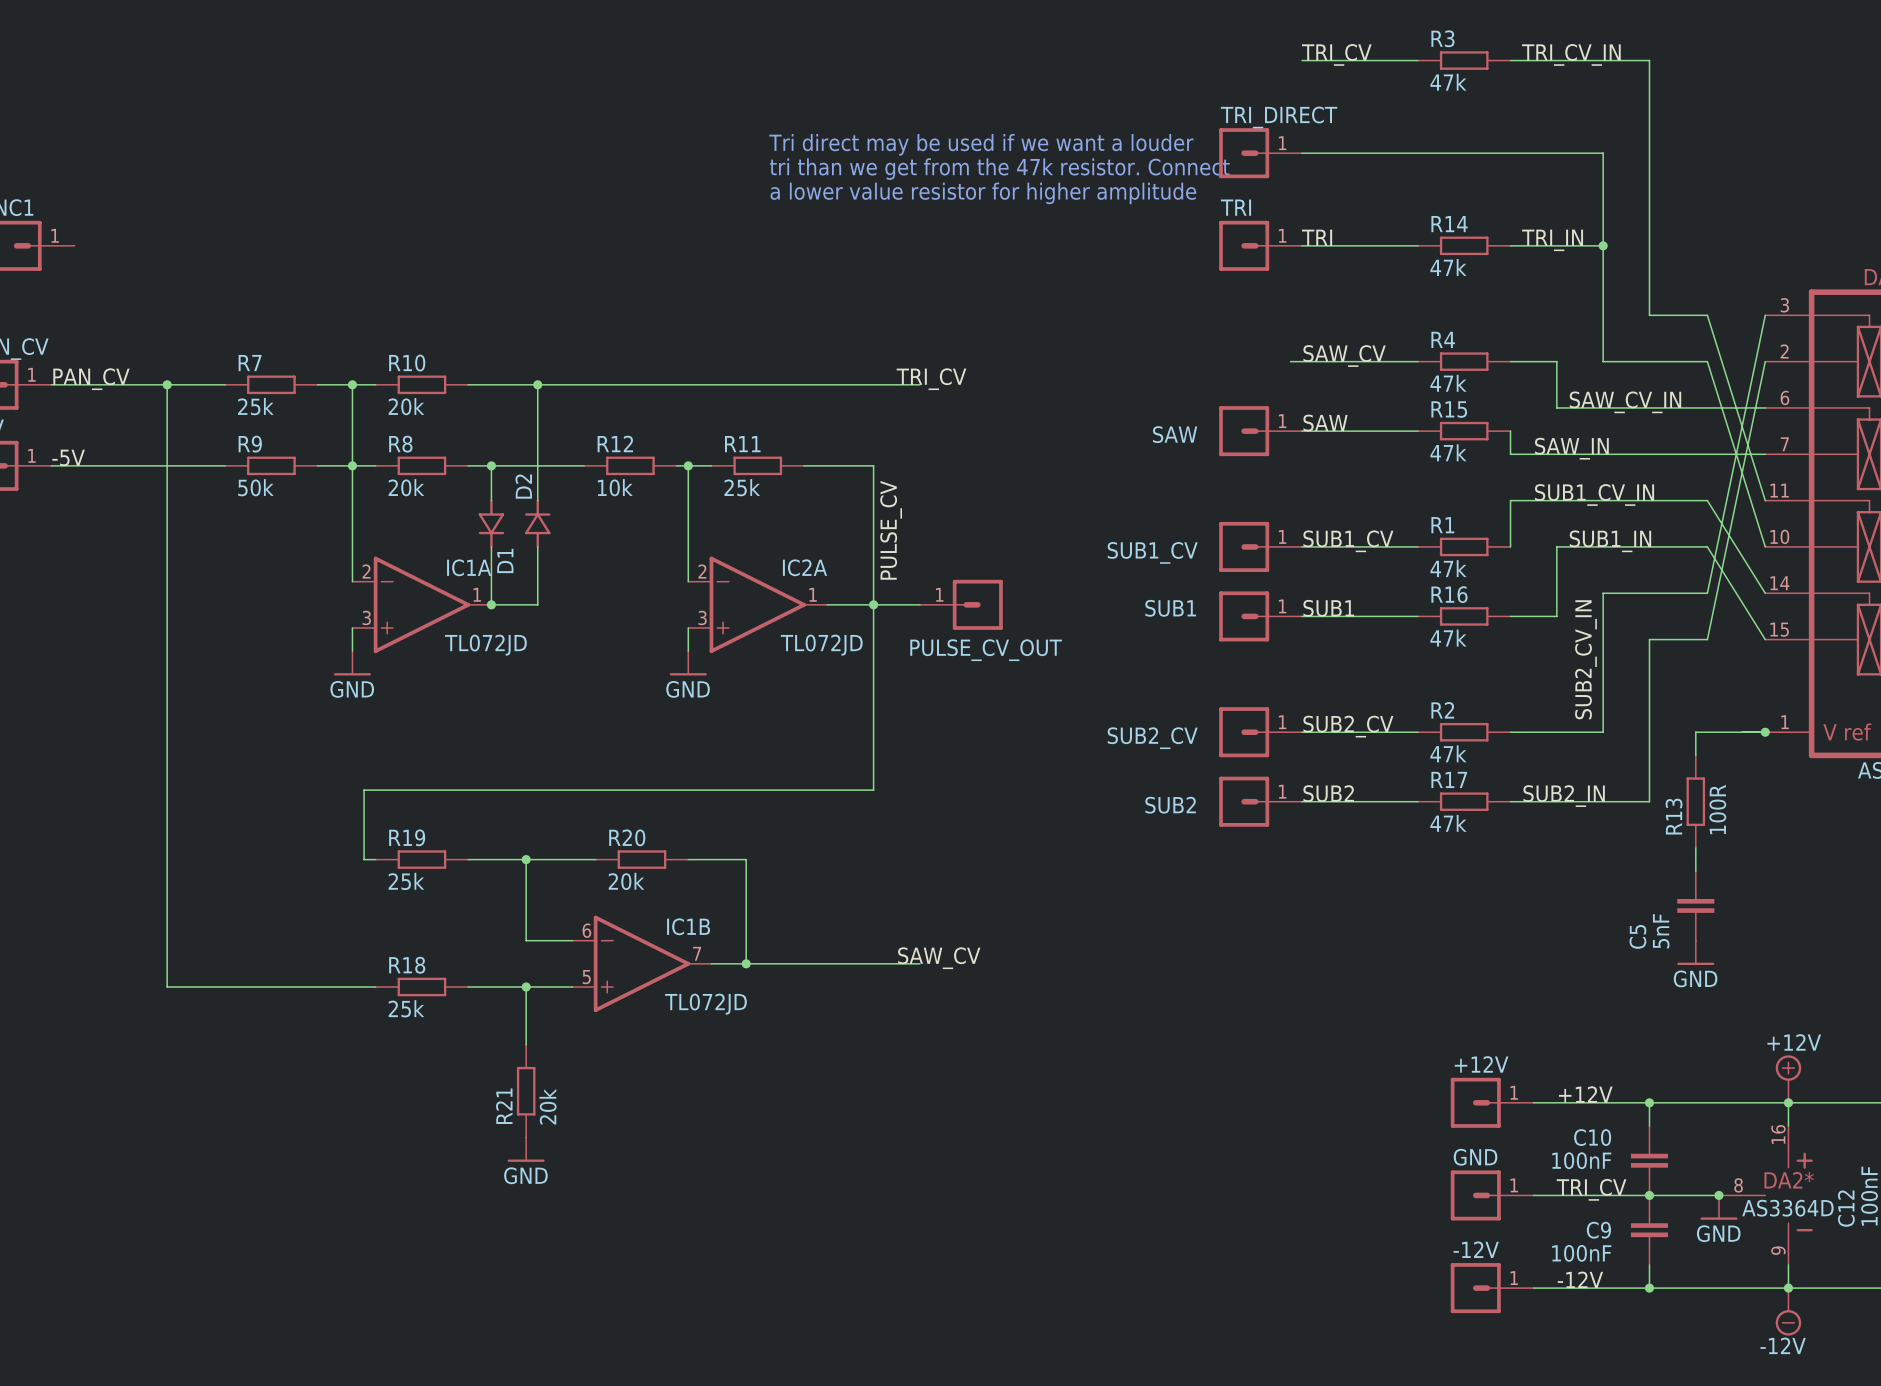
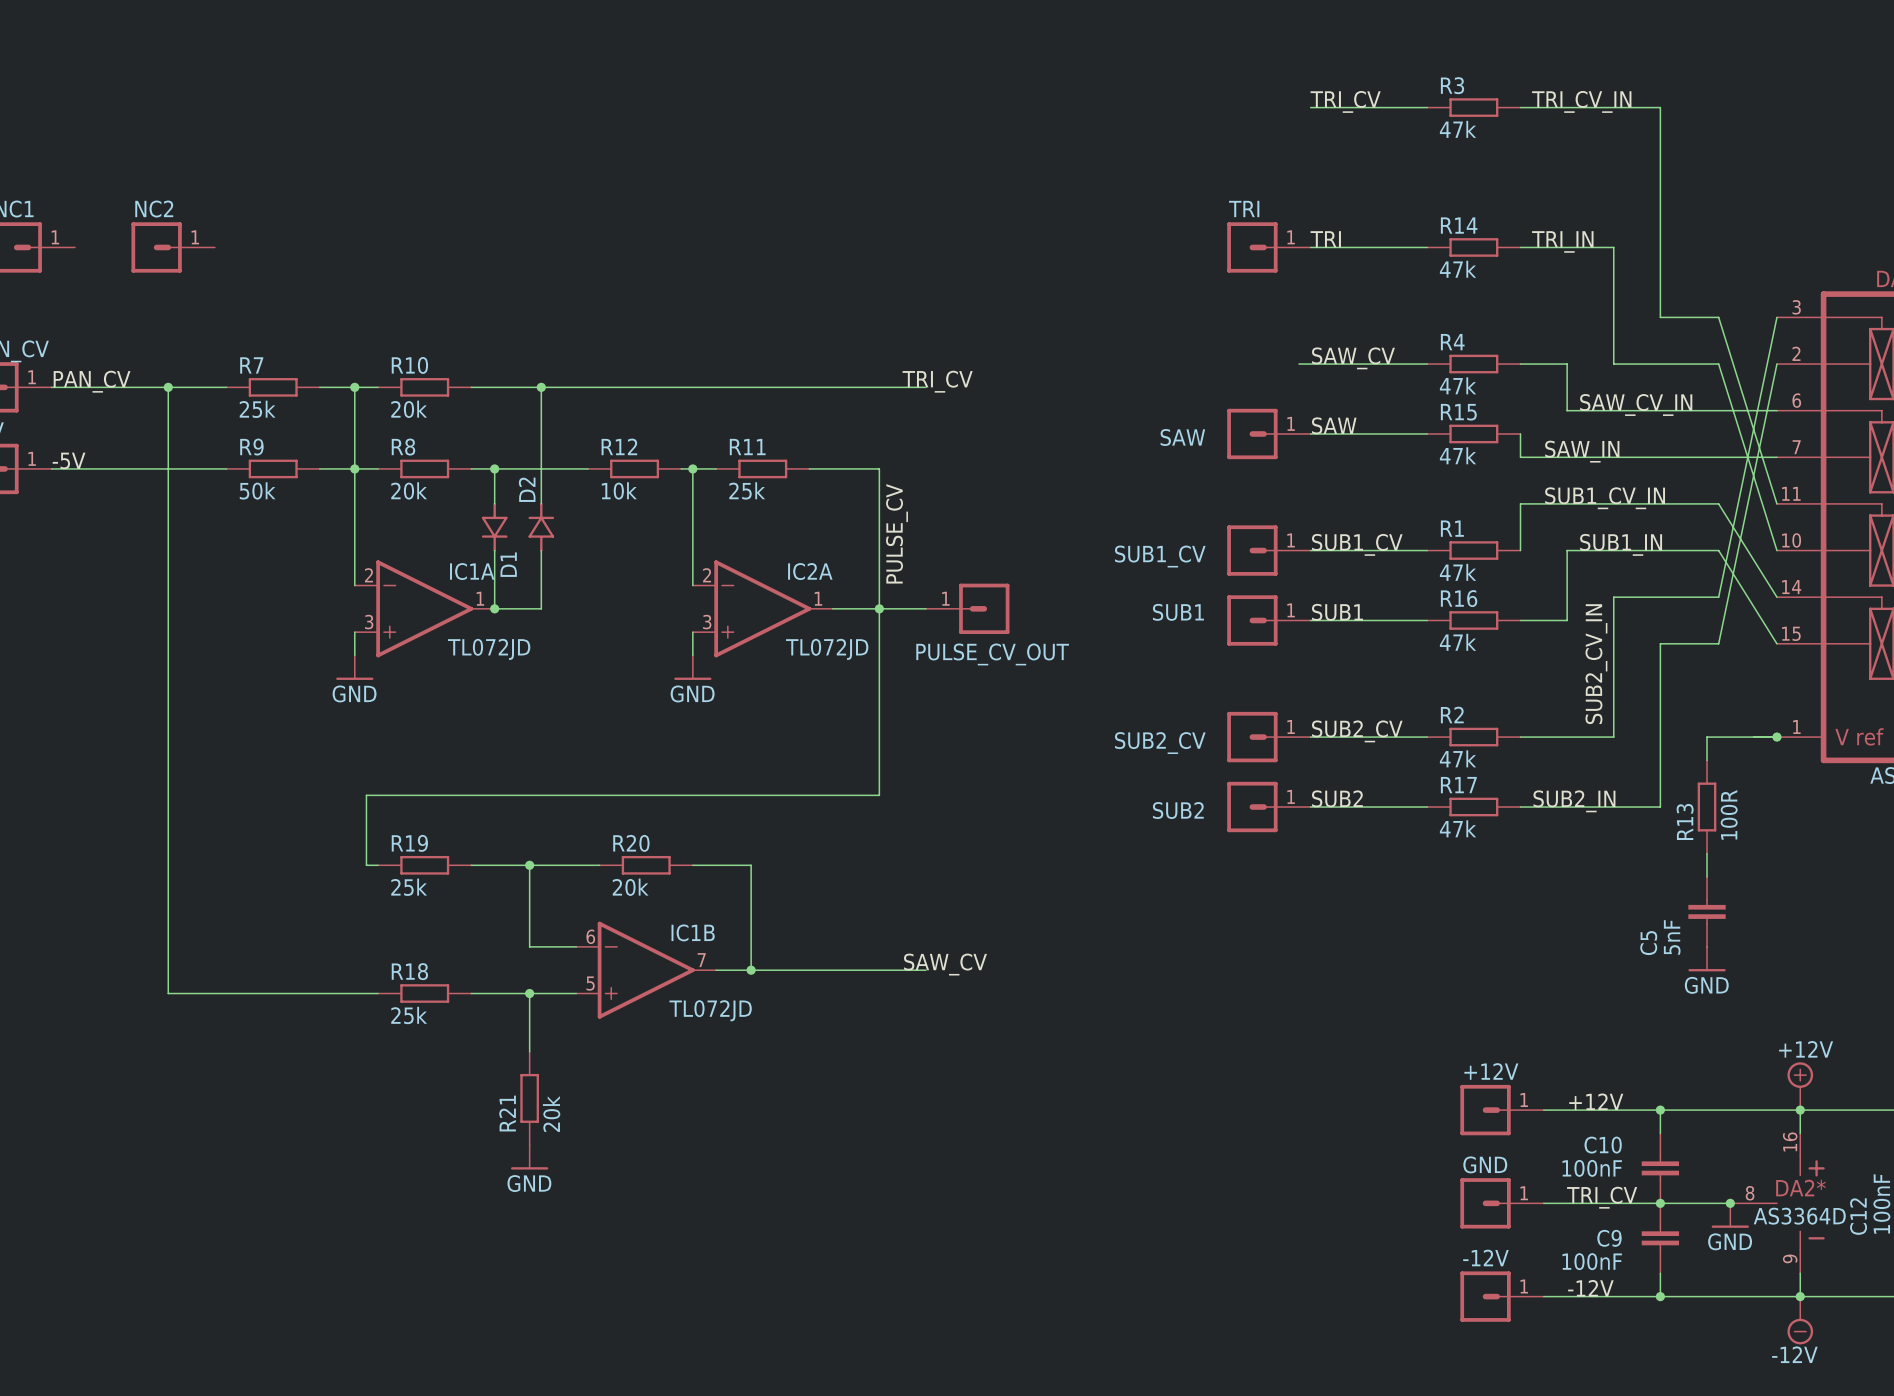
label position: TRI_CV (1336, 54) -> TRI_CV (1345, 101)
label position: TRI_CV_IN (1571, 54) -> TRI_CV_IN (1581, 101)
wire: (1302, 60) (1417, 60) -> (1310, 107) (1427, 107)
R3 position: (1464, 60) -> (1473, 107)
wire: (1510, 60) (1649, 60) (1649, 106) -> (1520, 107) (1660, 107)
text: Tri direct may be used if we want a louder (981, 144) -> none
TRI_DIRECT: (1260, 153) -> none
wire: (1302, 153) (1603, 153) (1603, 245) -> none
text: tri than we get from the 47k resistor. Connect (999, 169) -> none
text: a lower value resistor for higher amplitude (983, 193) -> none
NC2: none -> (173, 247)
junction: (1603, 245) -> none

